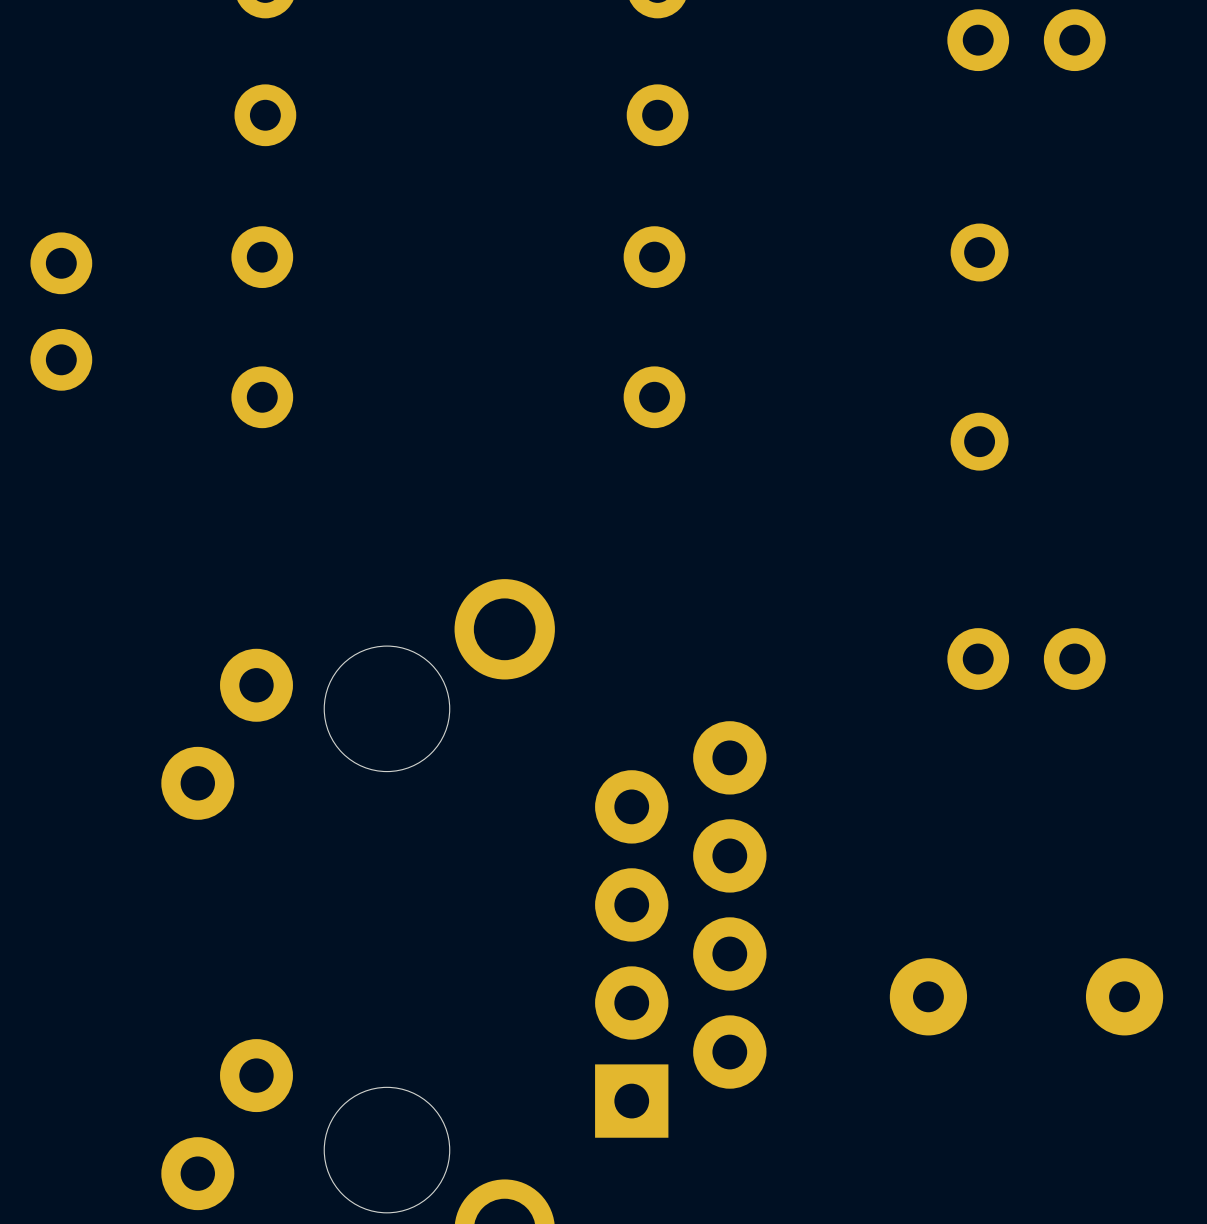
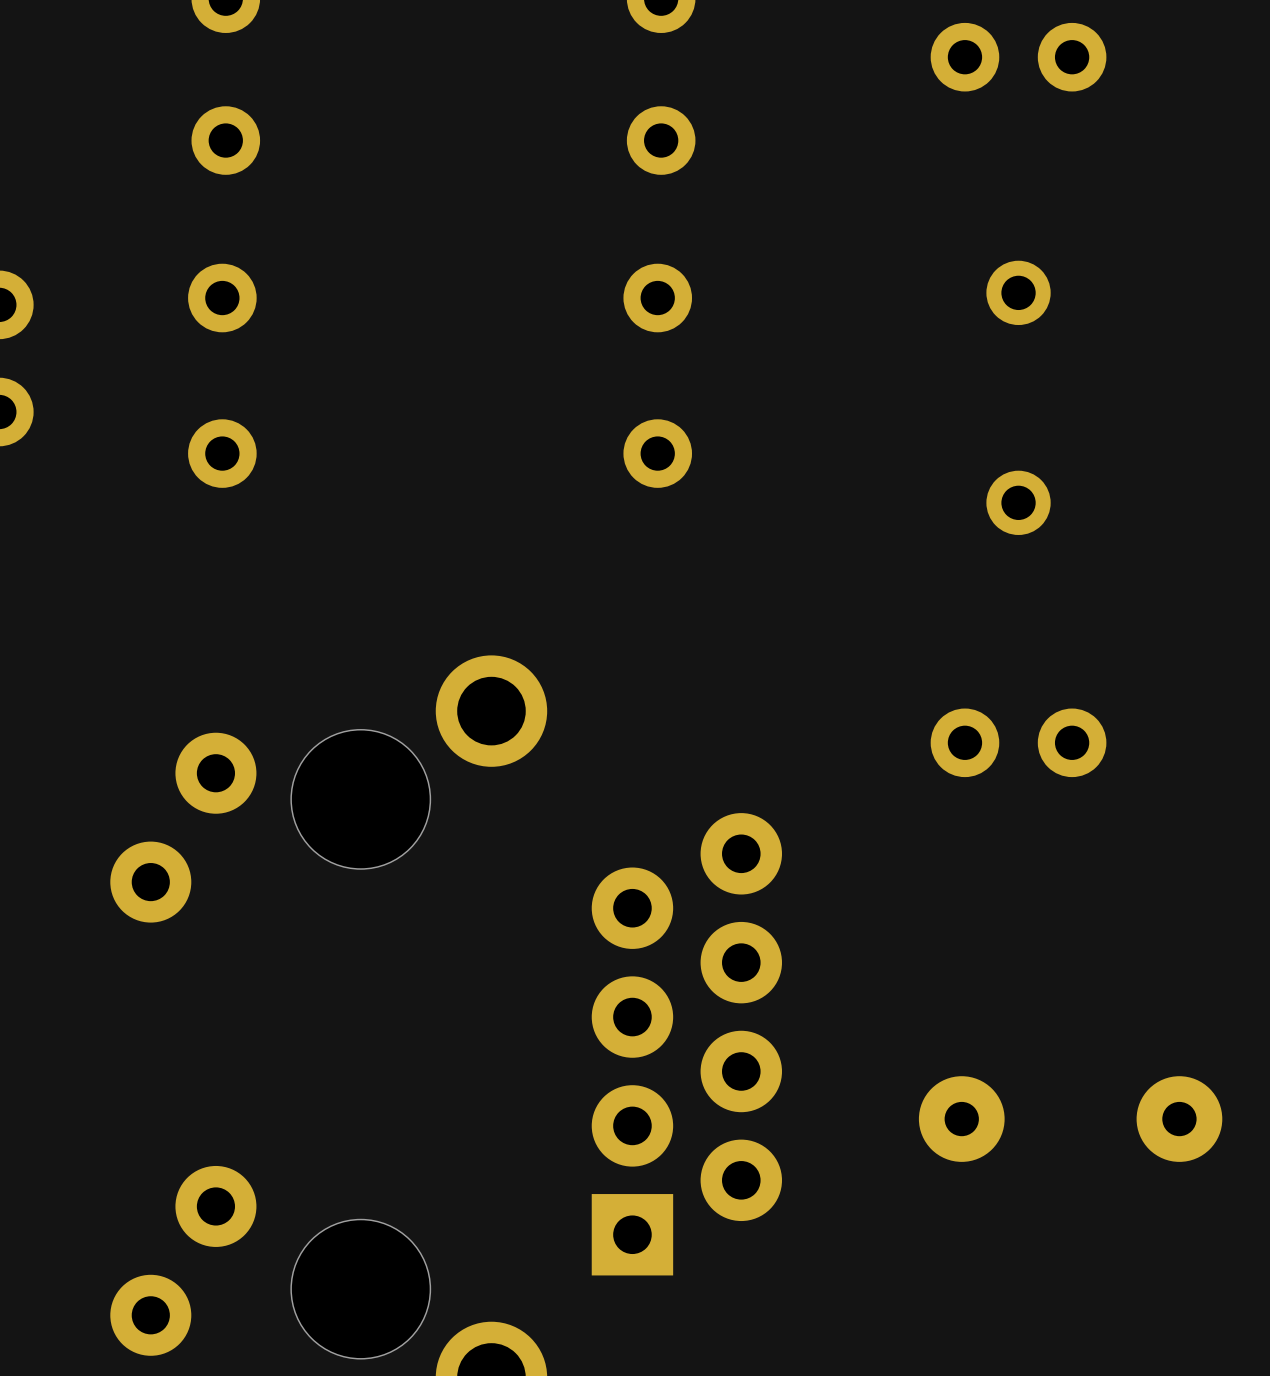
part position: (1026, 40) -> (1018, 57)
part position: (1026, 659) -> (1018, 742)

